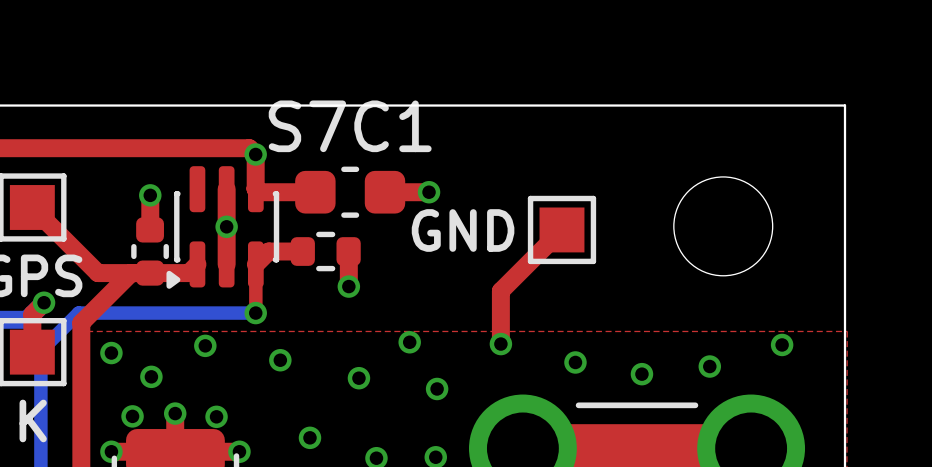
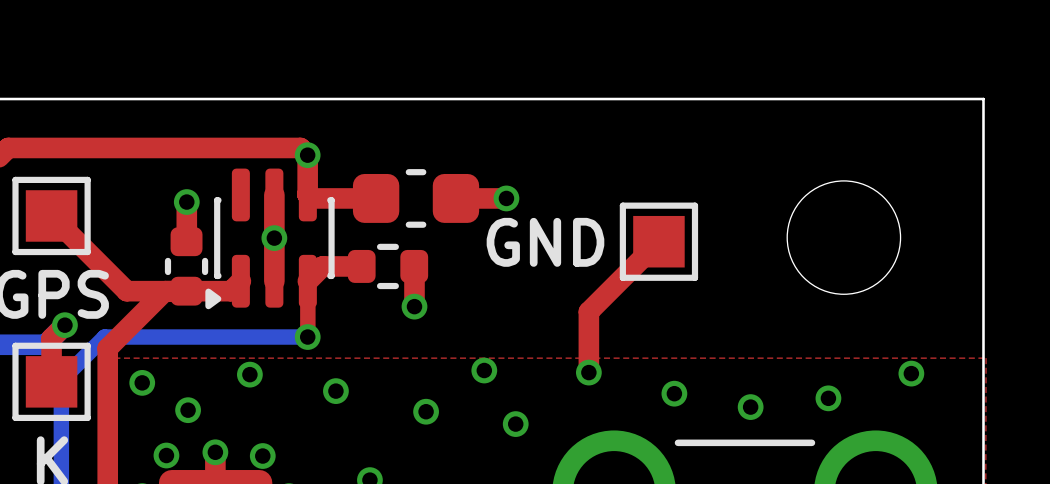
S7C1 name: S7C1 (350, 126) -> none

